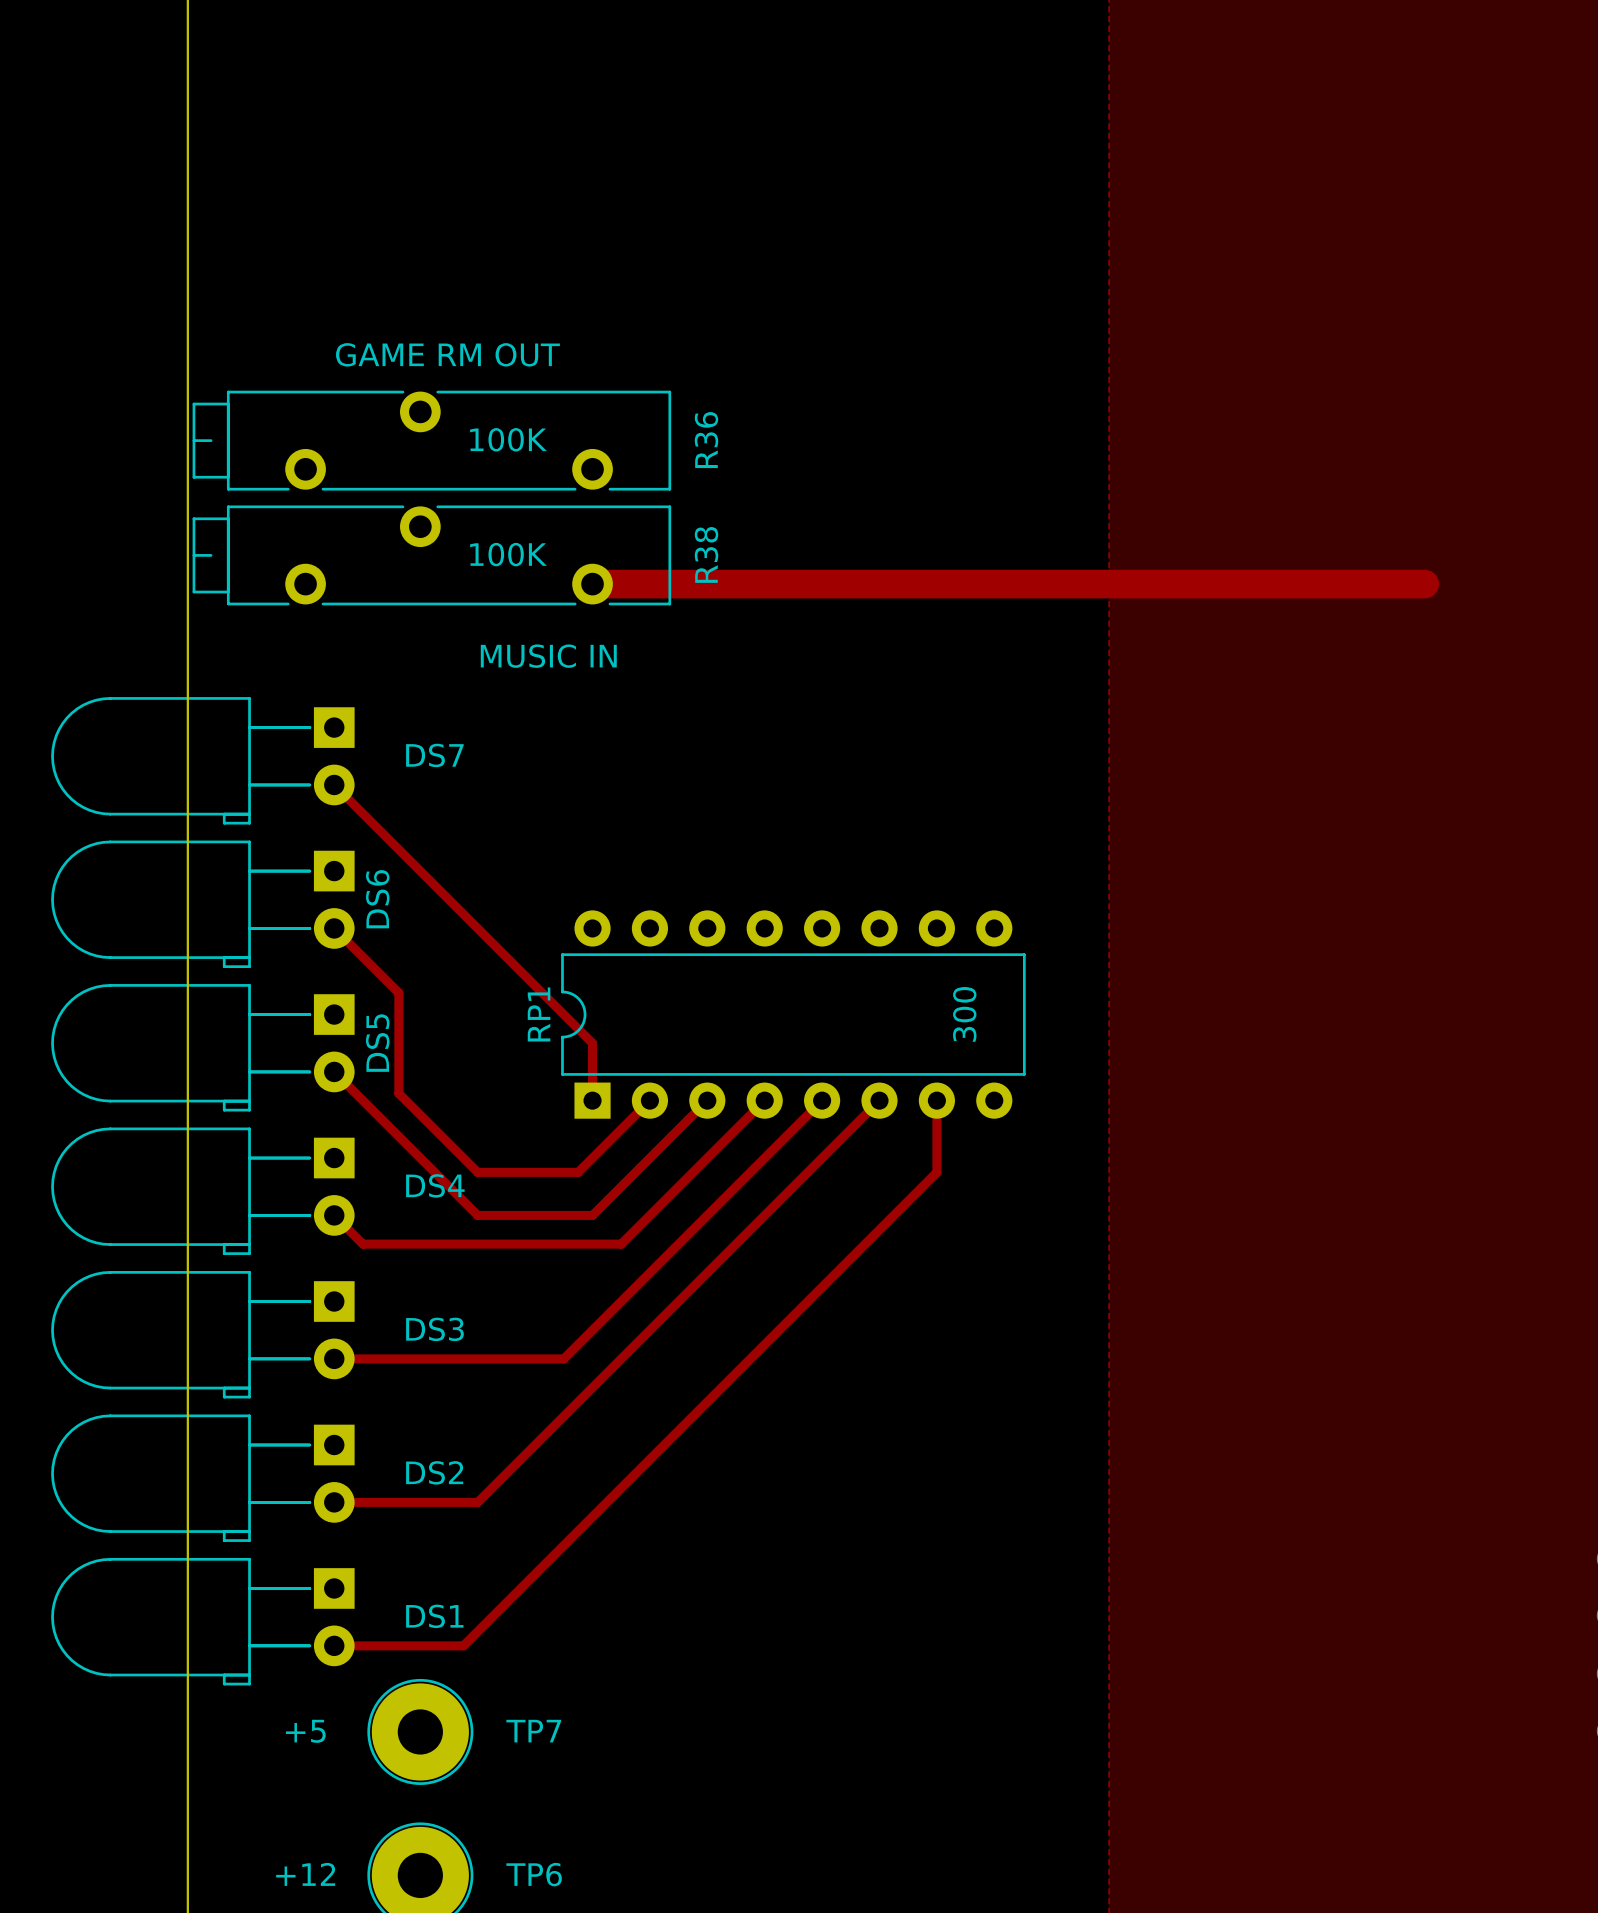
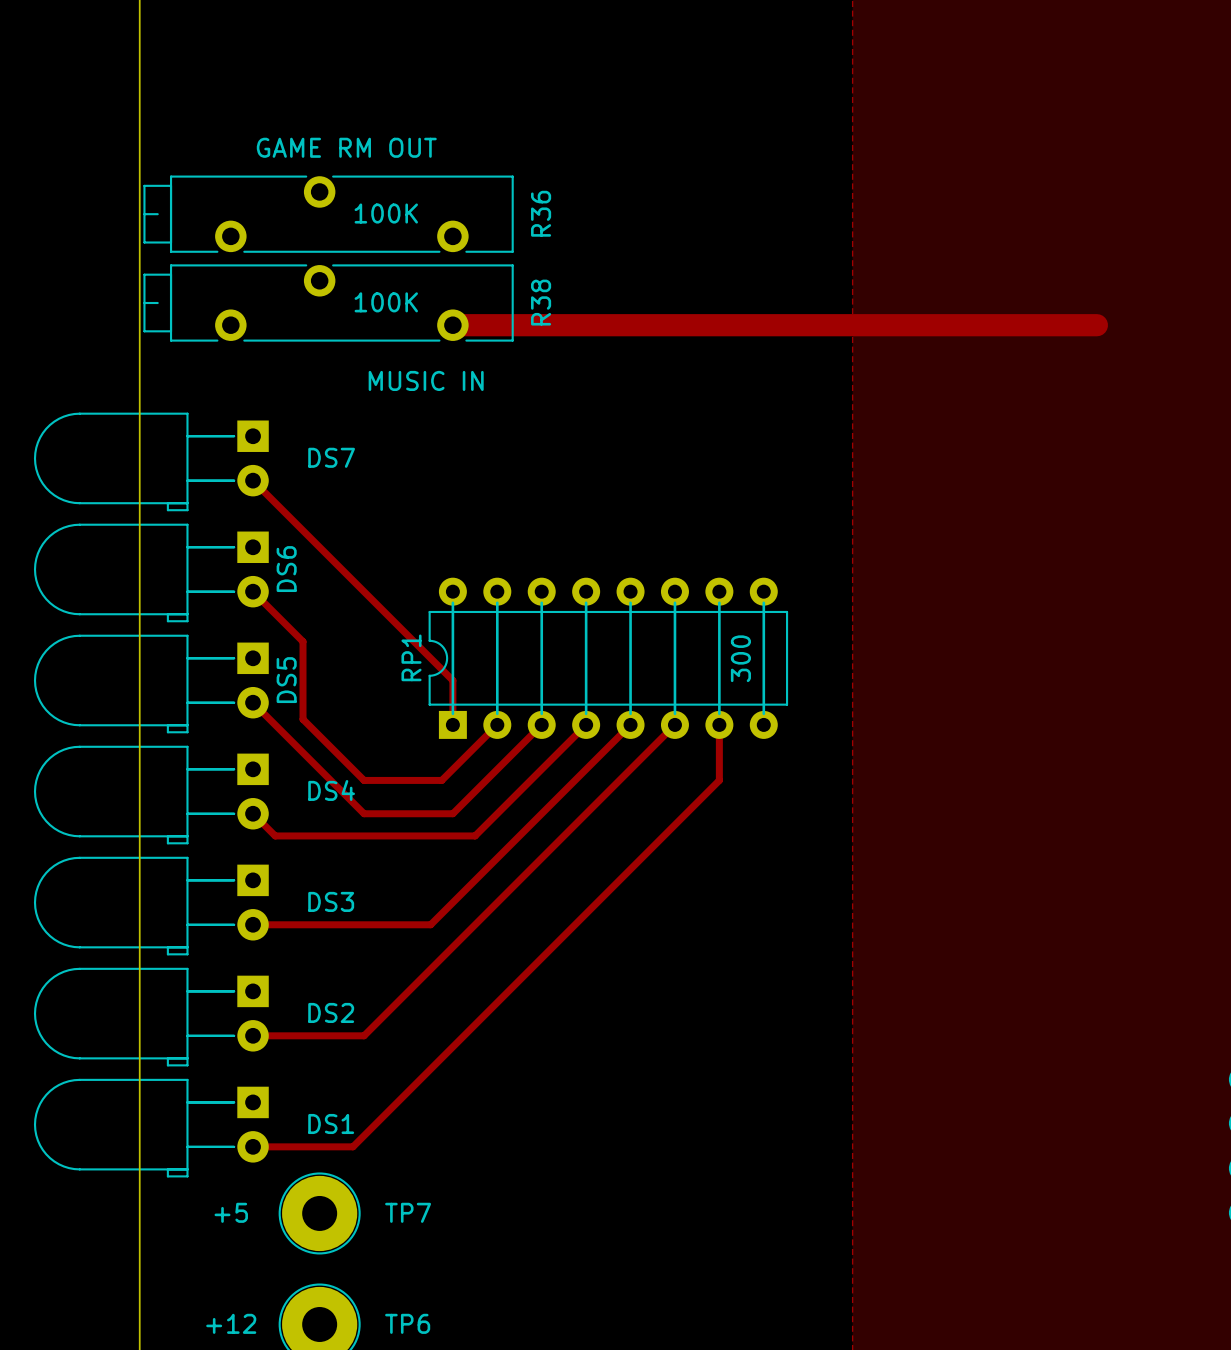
line: none -> (452, 602) (452, 713)
line: none -> (497, 602) (497, 713)
line: none -> (541, 602) (541, 713)
line: none -> (586, 602) (586, 713)
line: none -> (630, 602) (630, 713)
line: none -> (674, 602) (674, 713)
line: none -> (719, 602) (719, 713)
line: none -> (763, 602) (763, 713)

